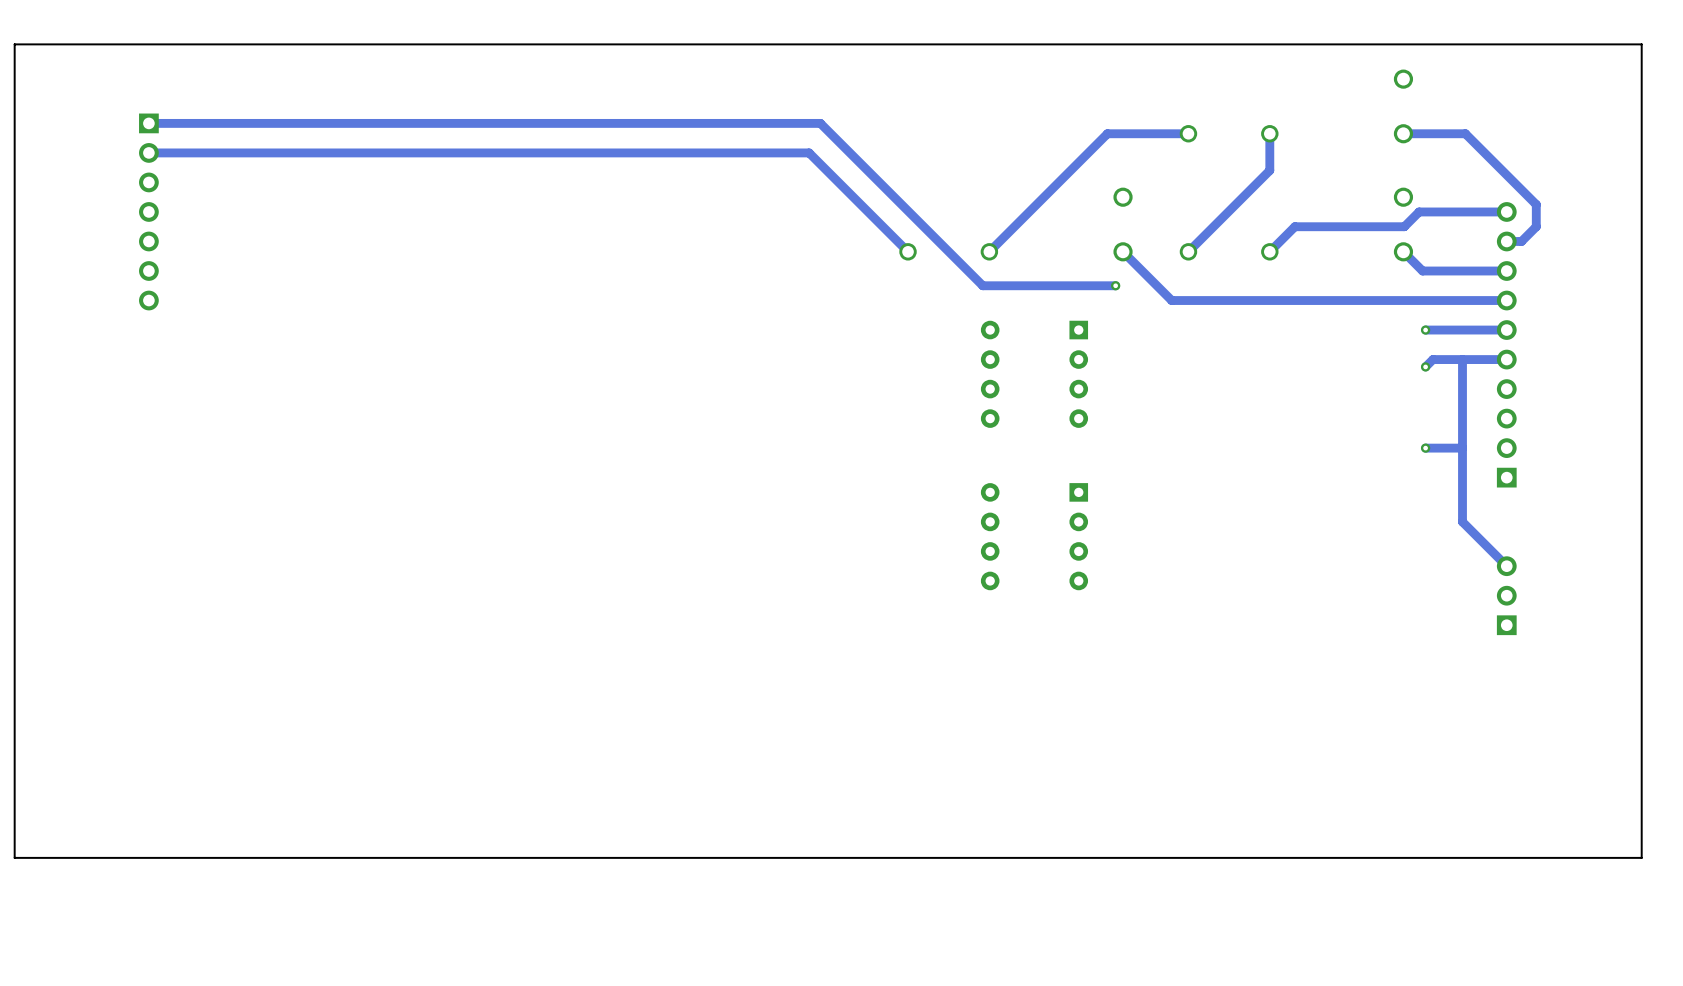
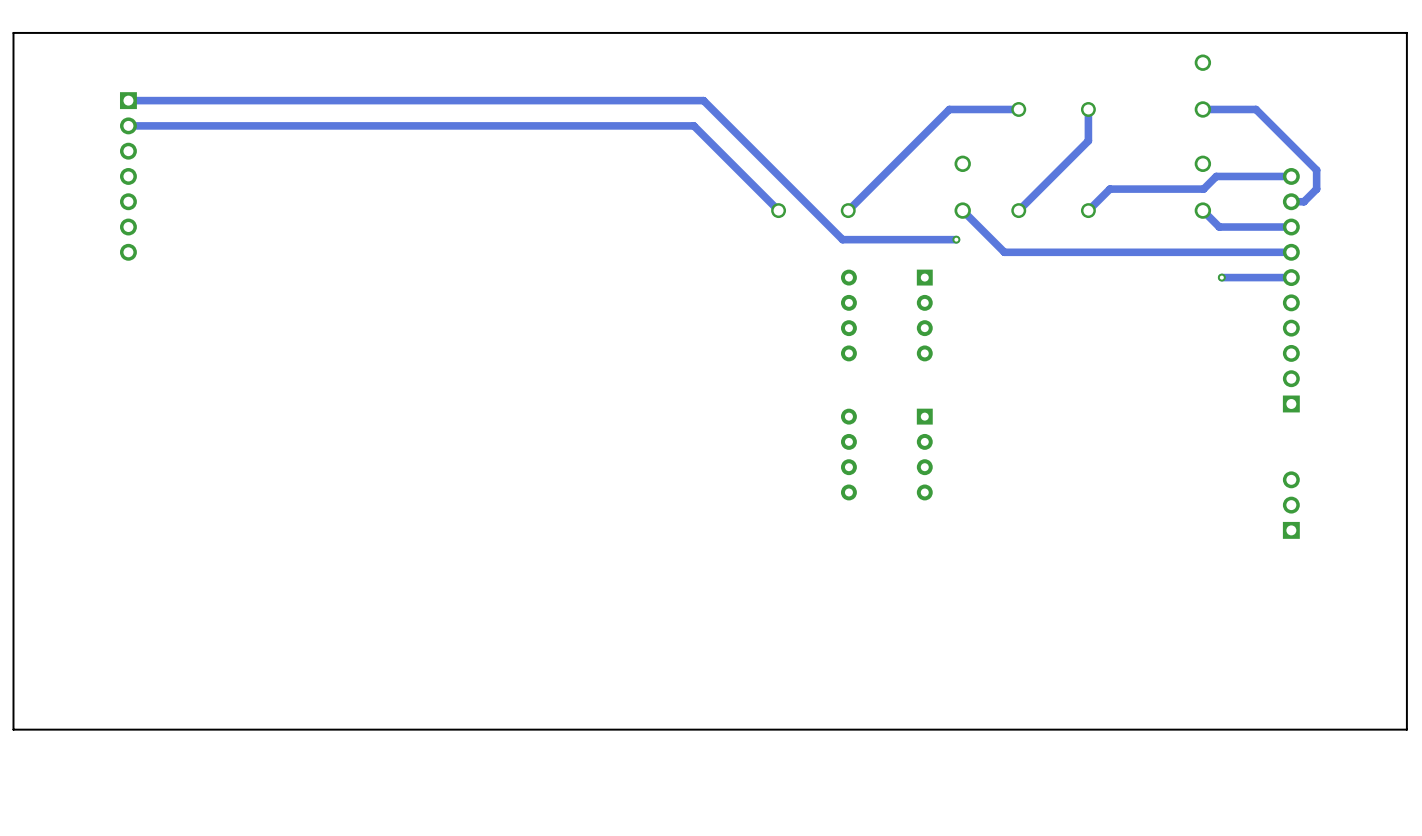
track: (1462, 359) (1462, 521) (1506, 566) -> none
track: (1506, 359) (1432, 359) (1425, 366) -> none
via: (1425, 366) -> none
via: (1425, 448) -> none
track: (1462, 448) (1425, 448) -> none

